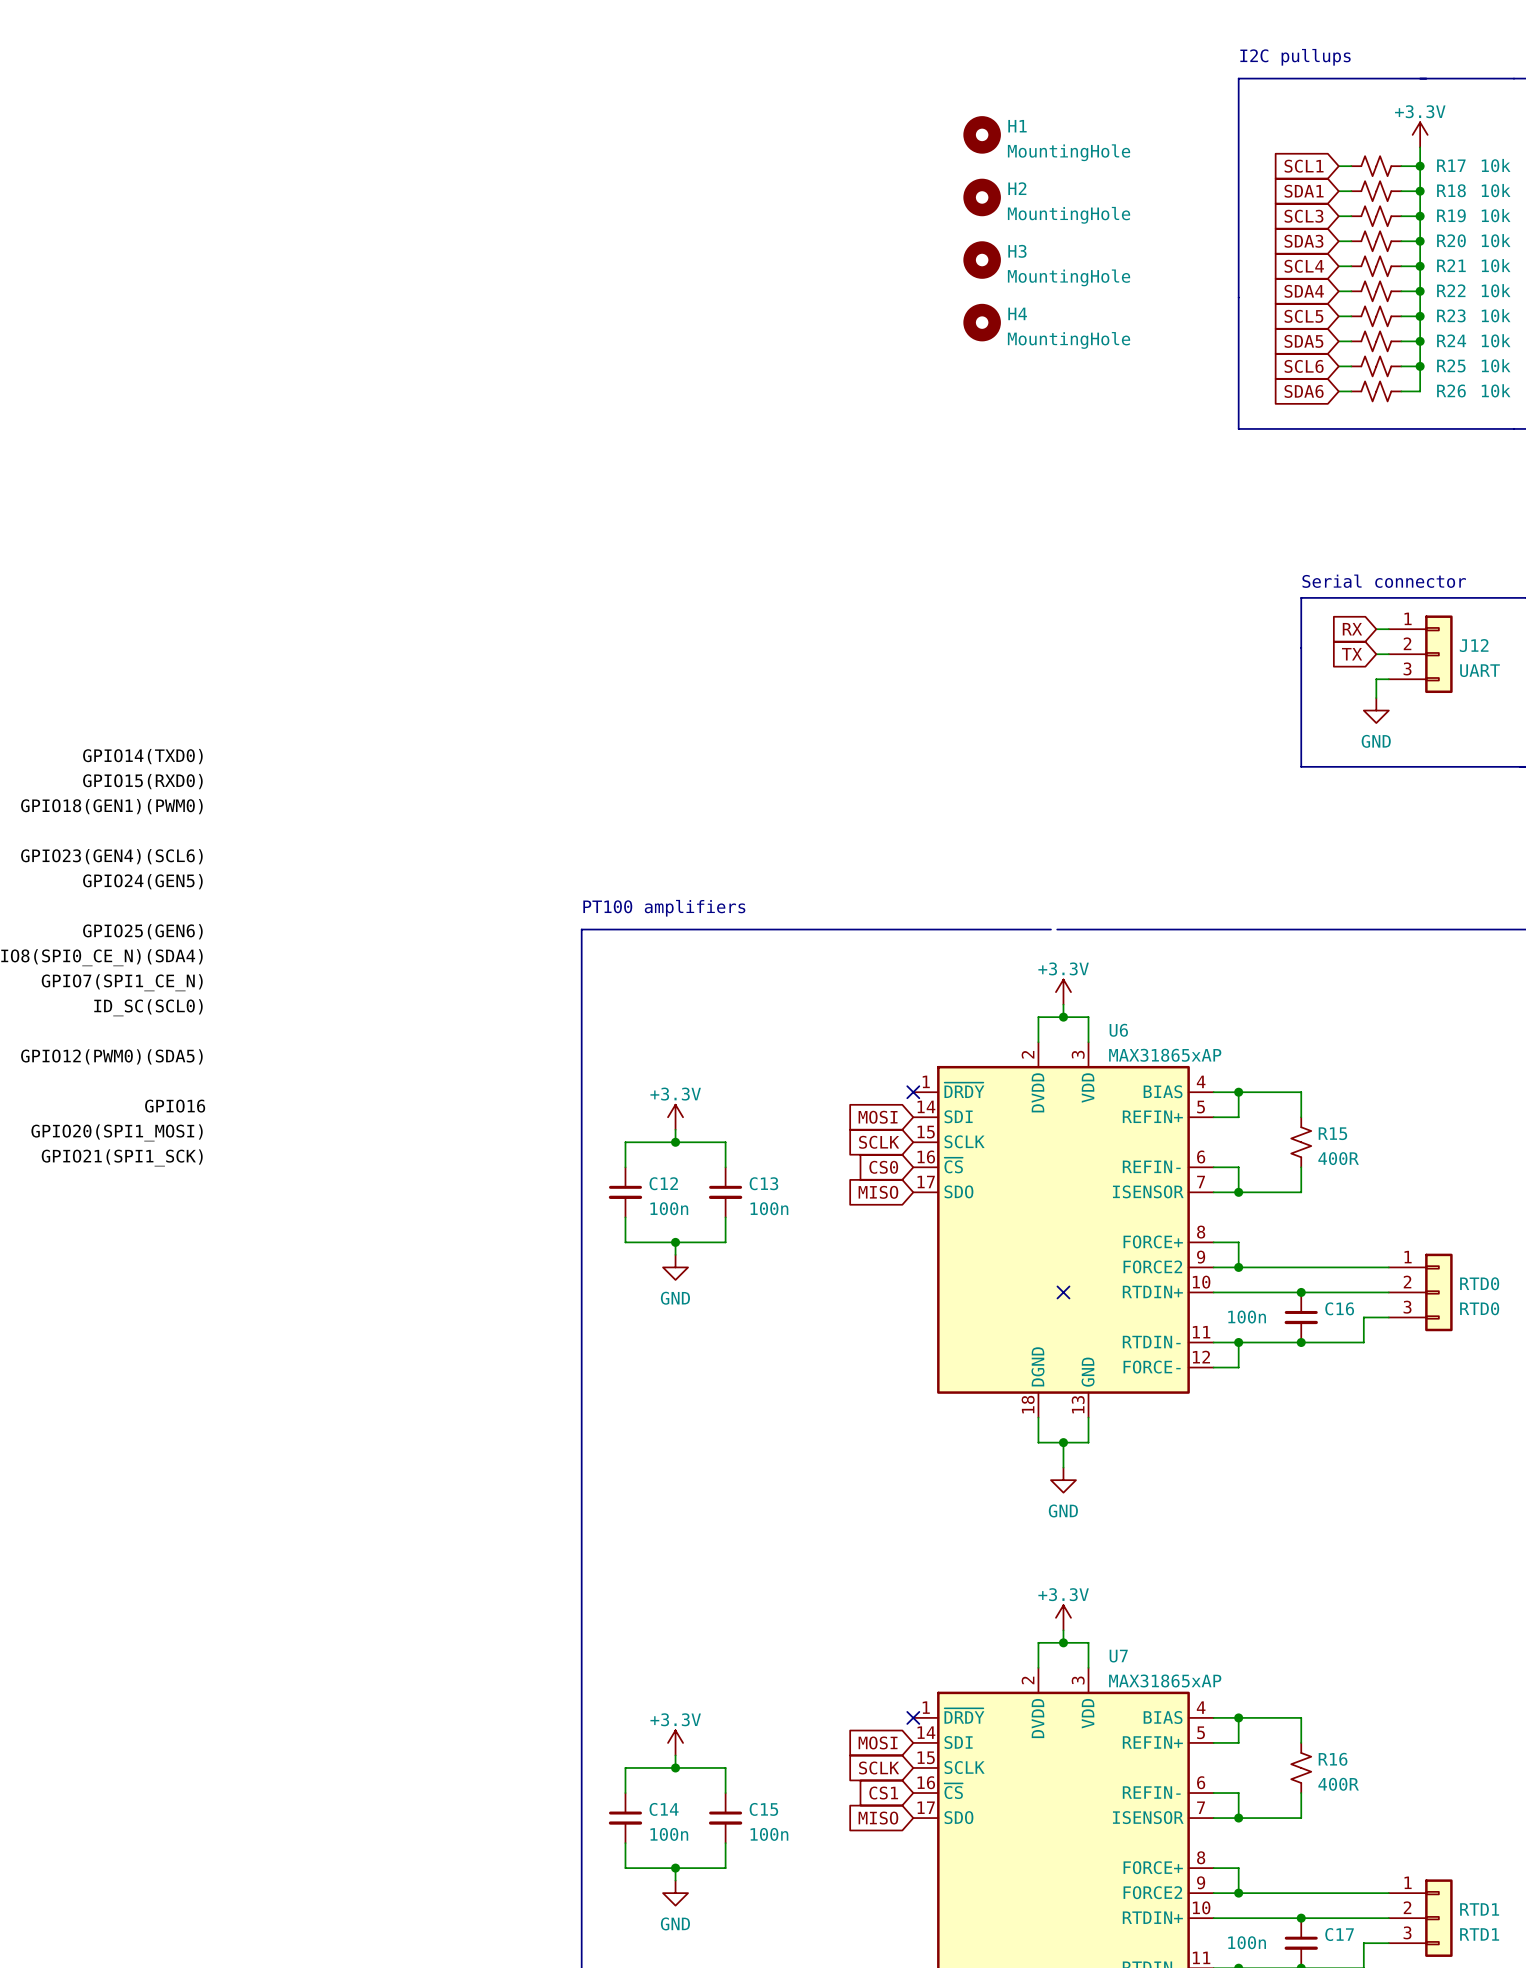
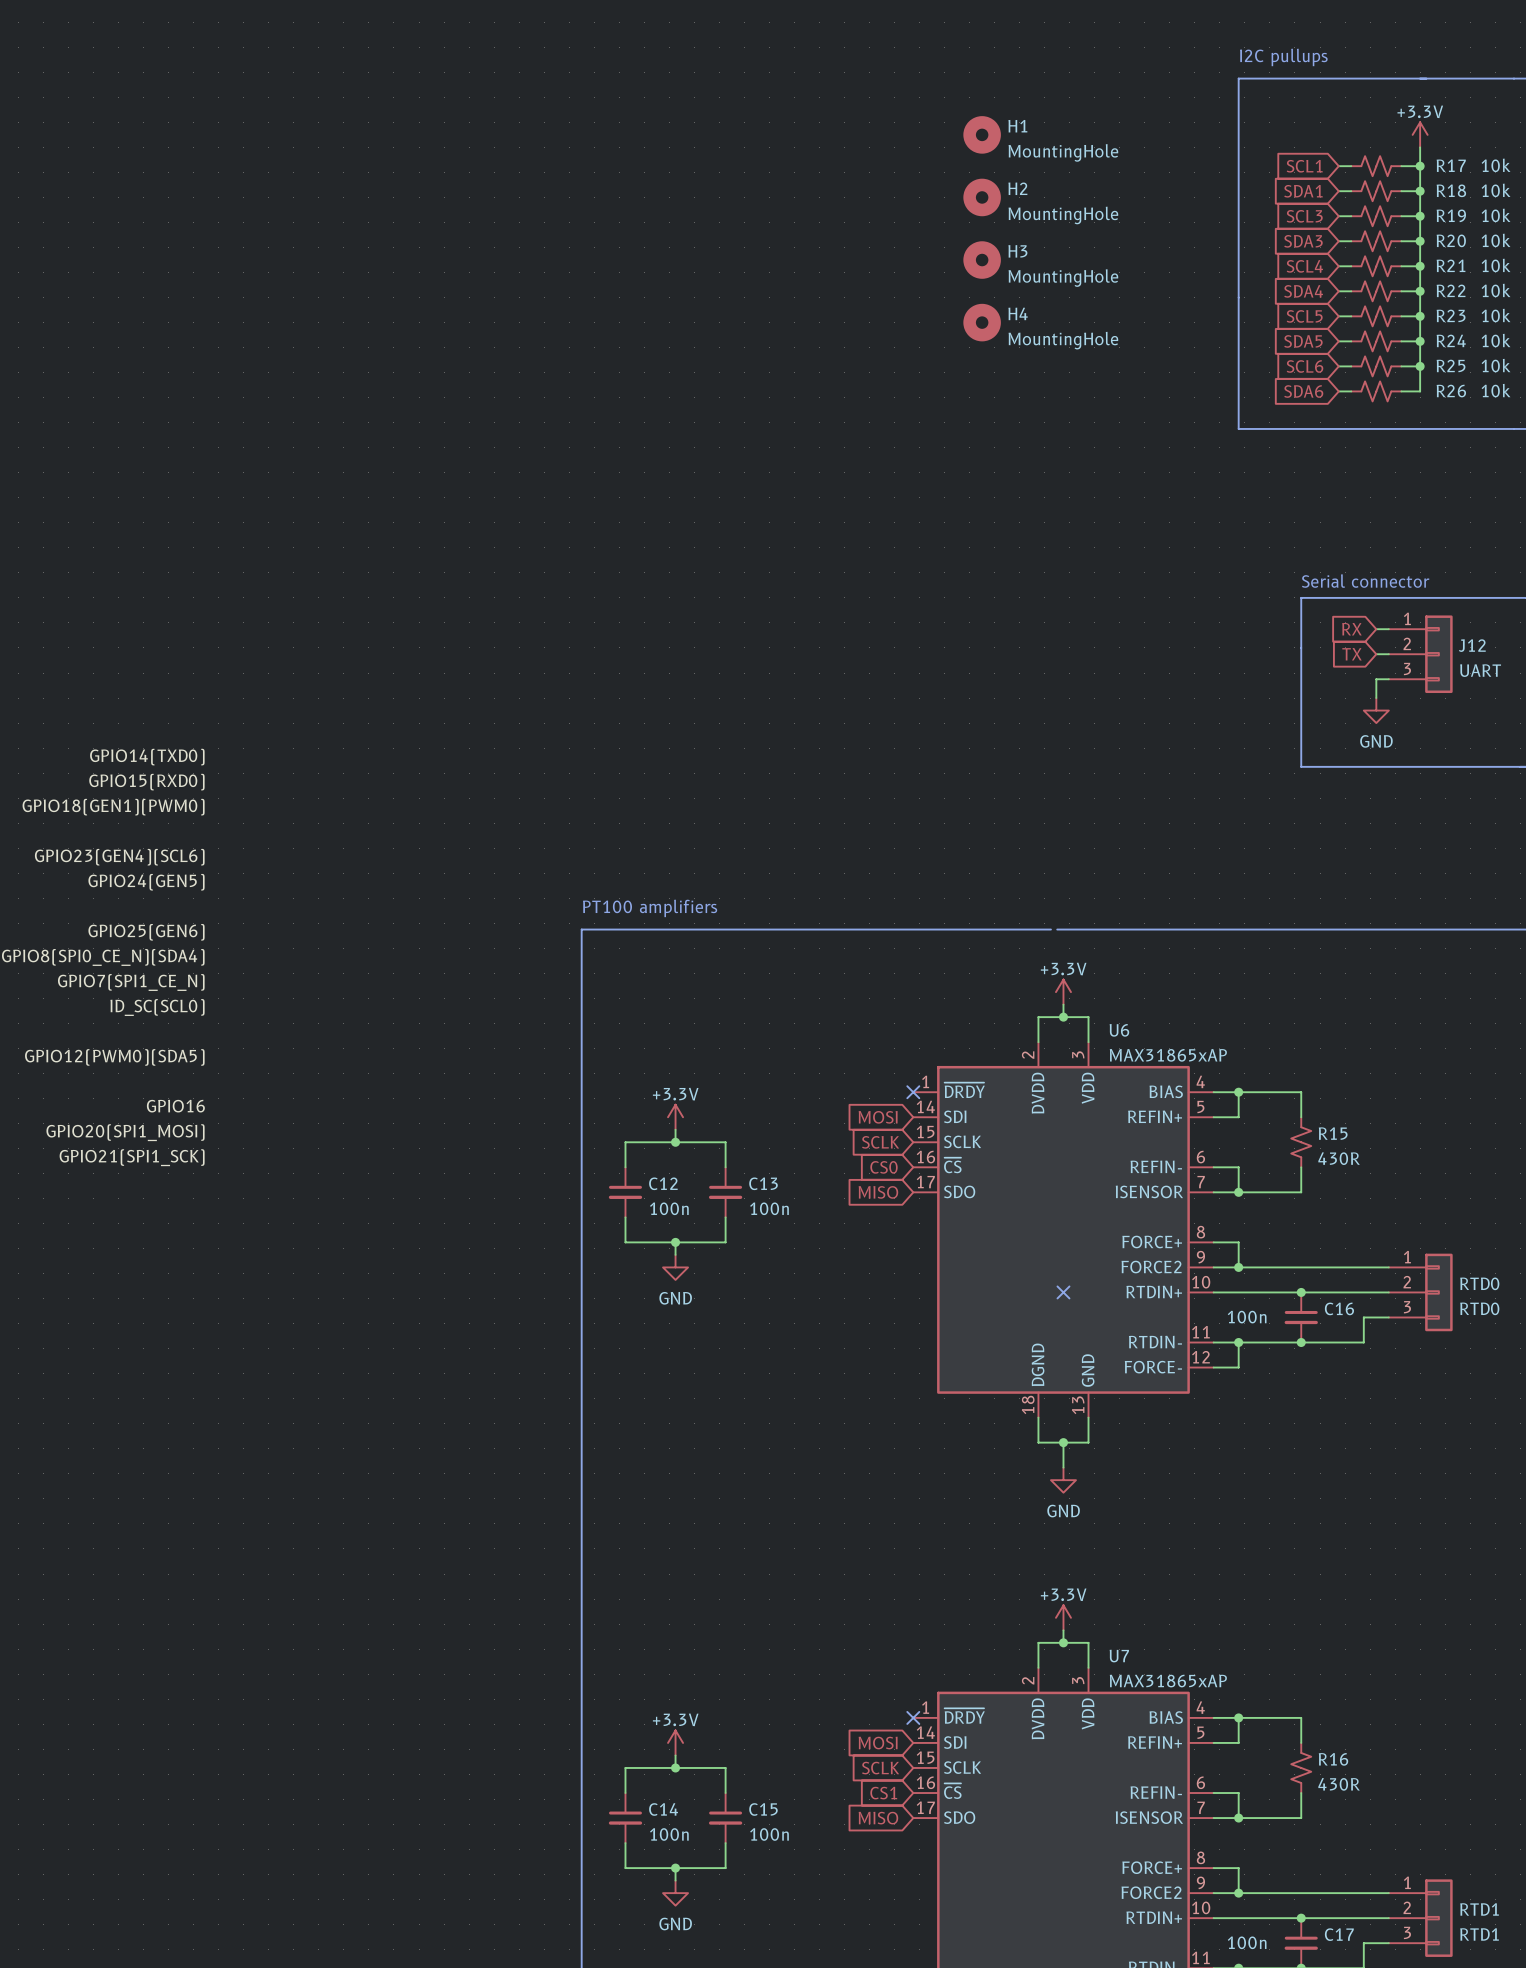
R15 value: 400R (1338, 1158) -> 430R (1339, 1158)
R16 value: 400R (1338, 1784) -> 430R (1339, 1784)

